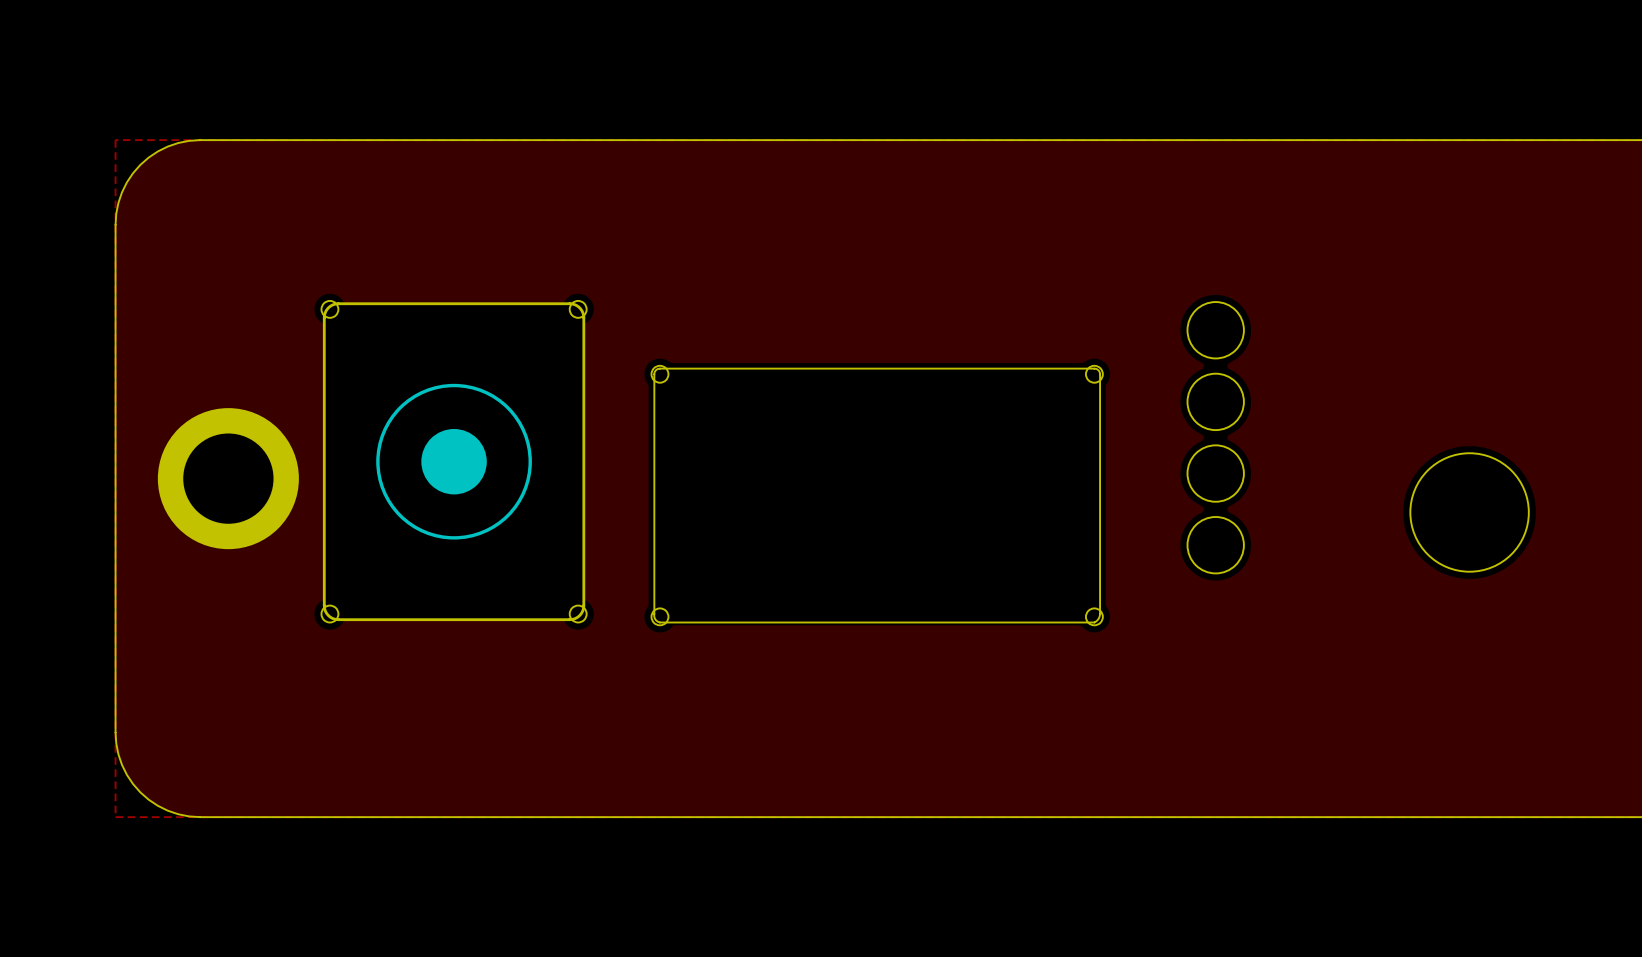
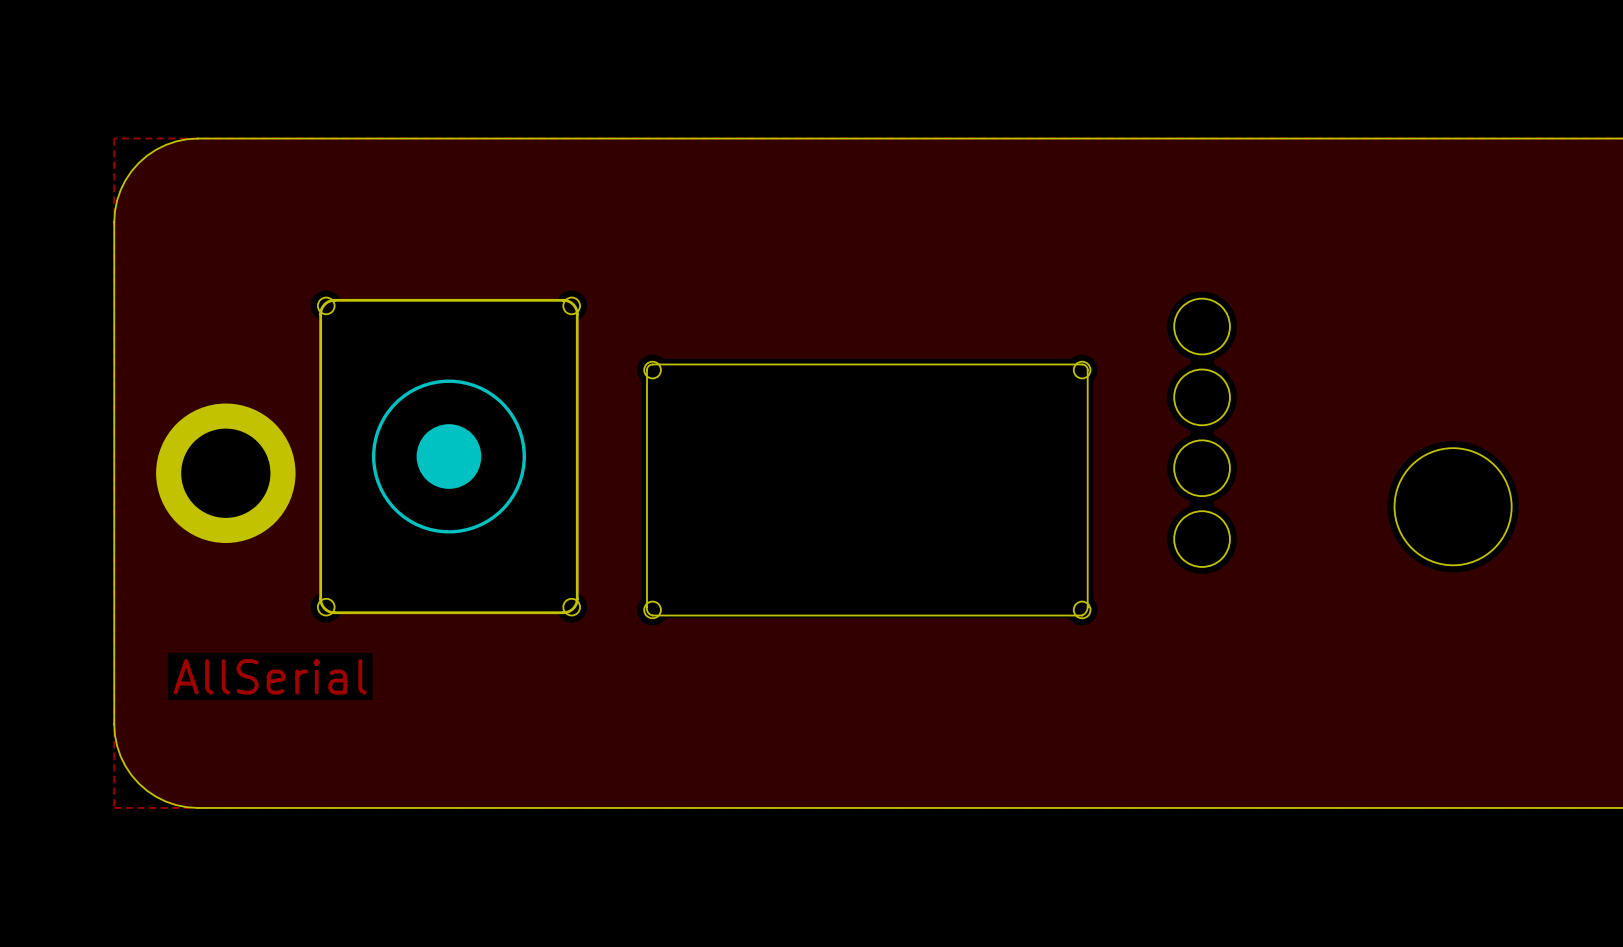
part text: none -> AllSerial (270, 676)

